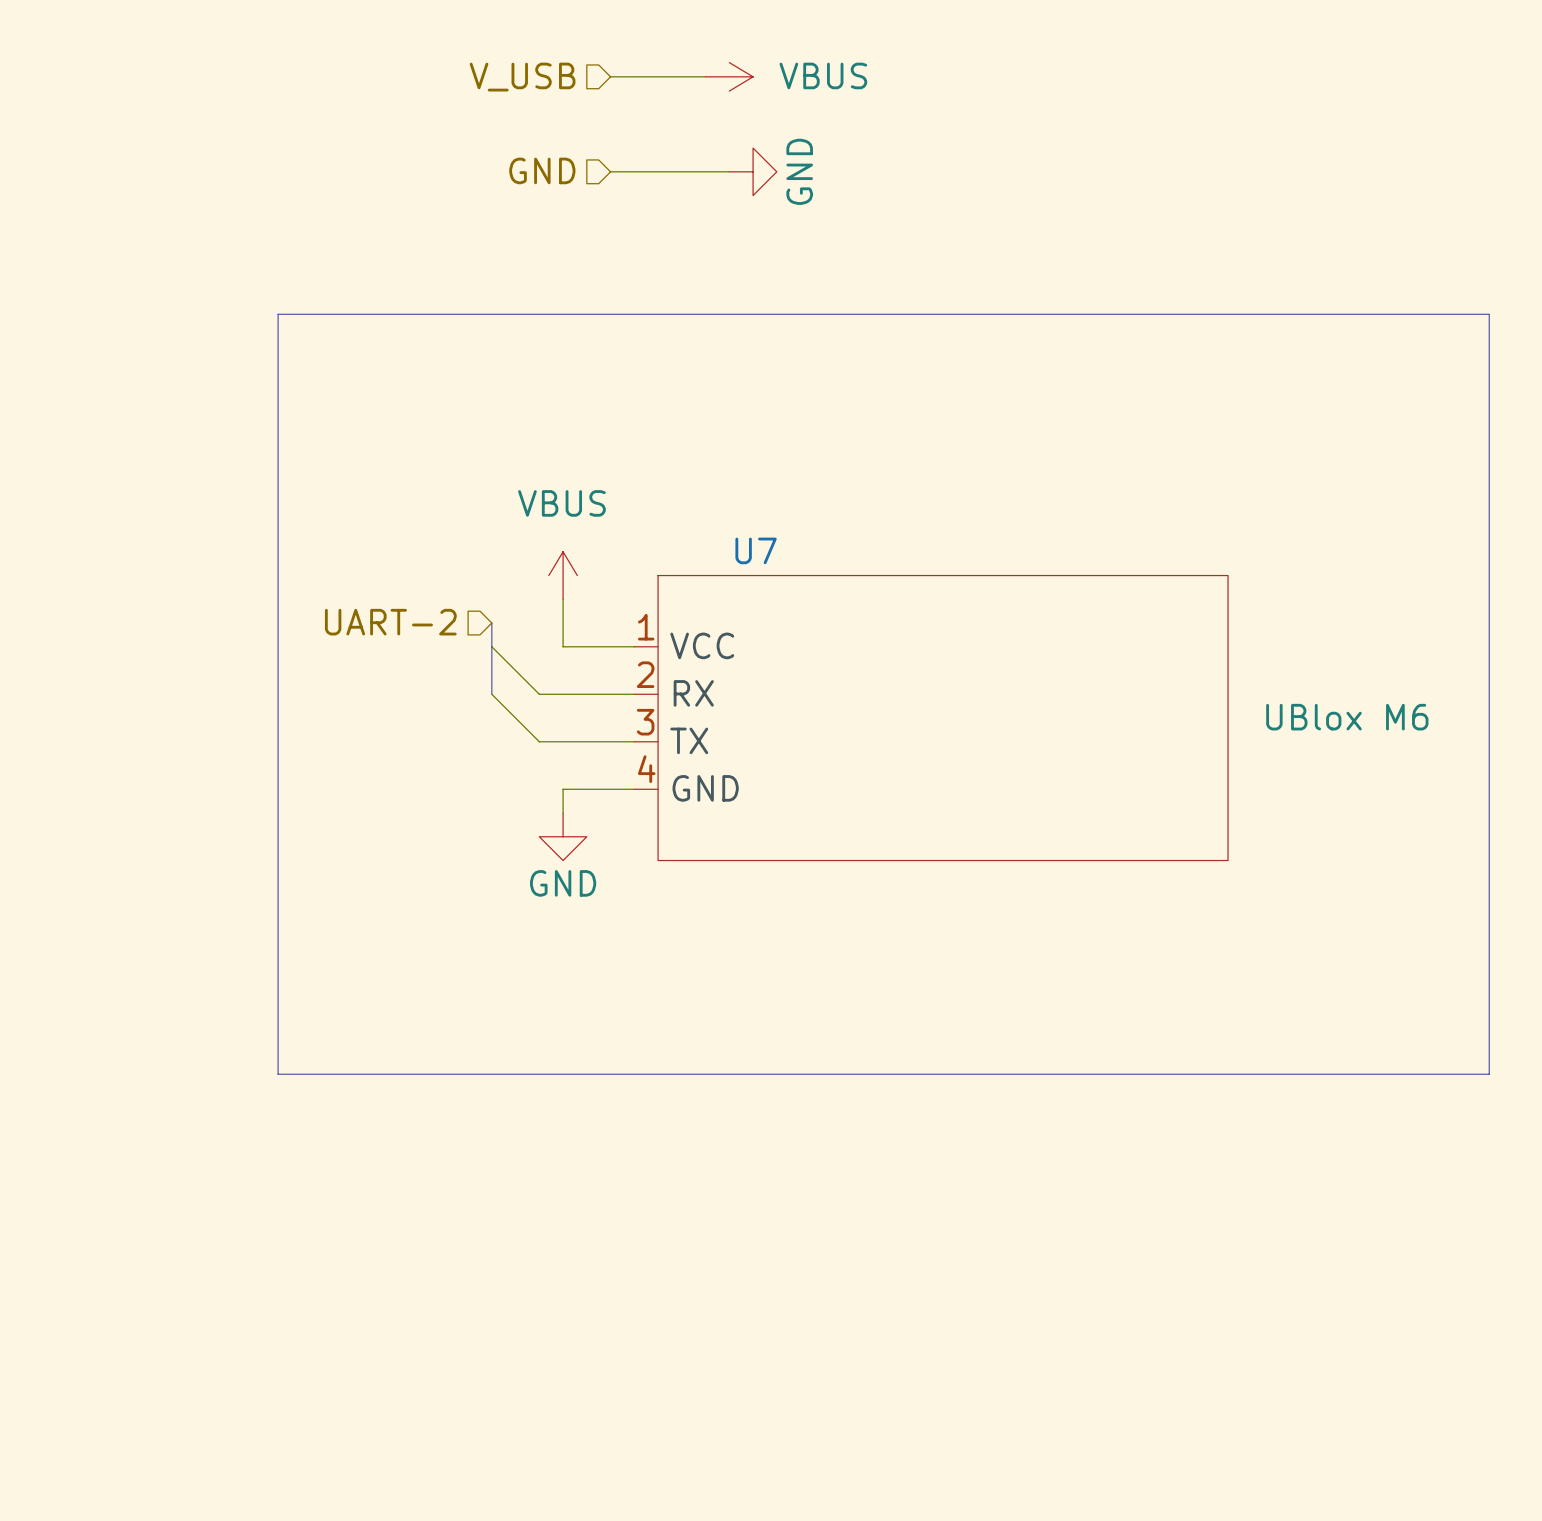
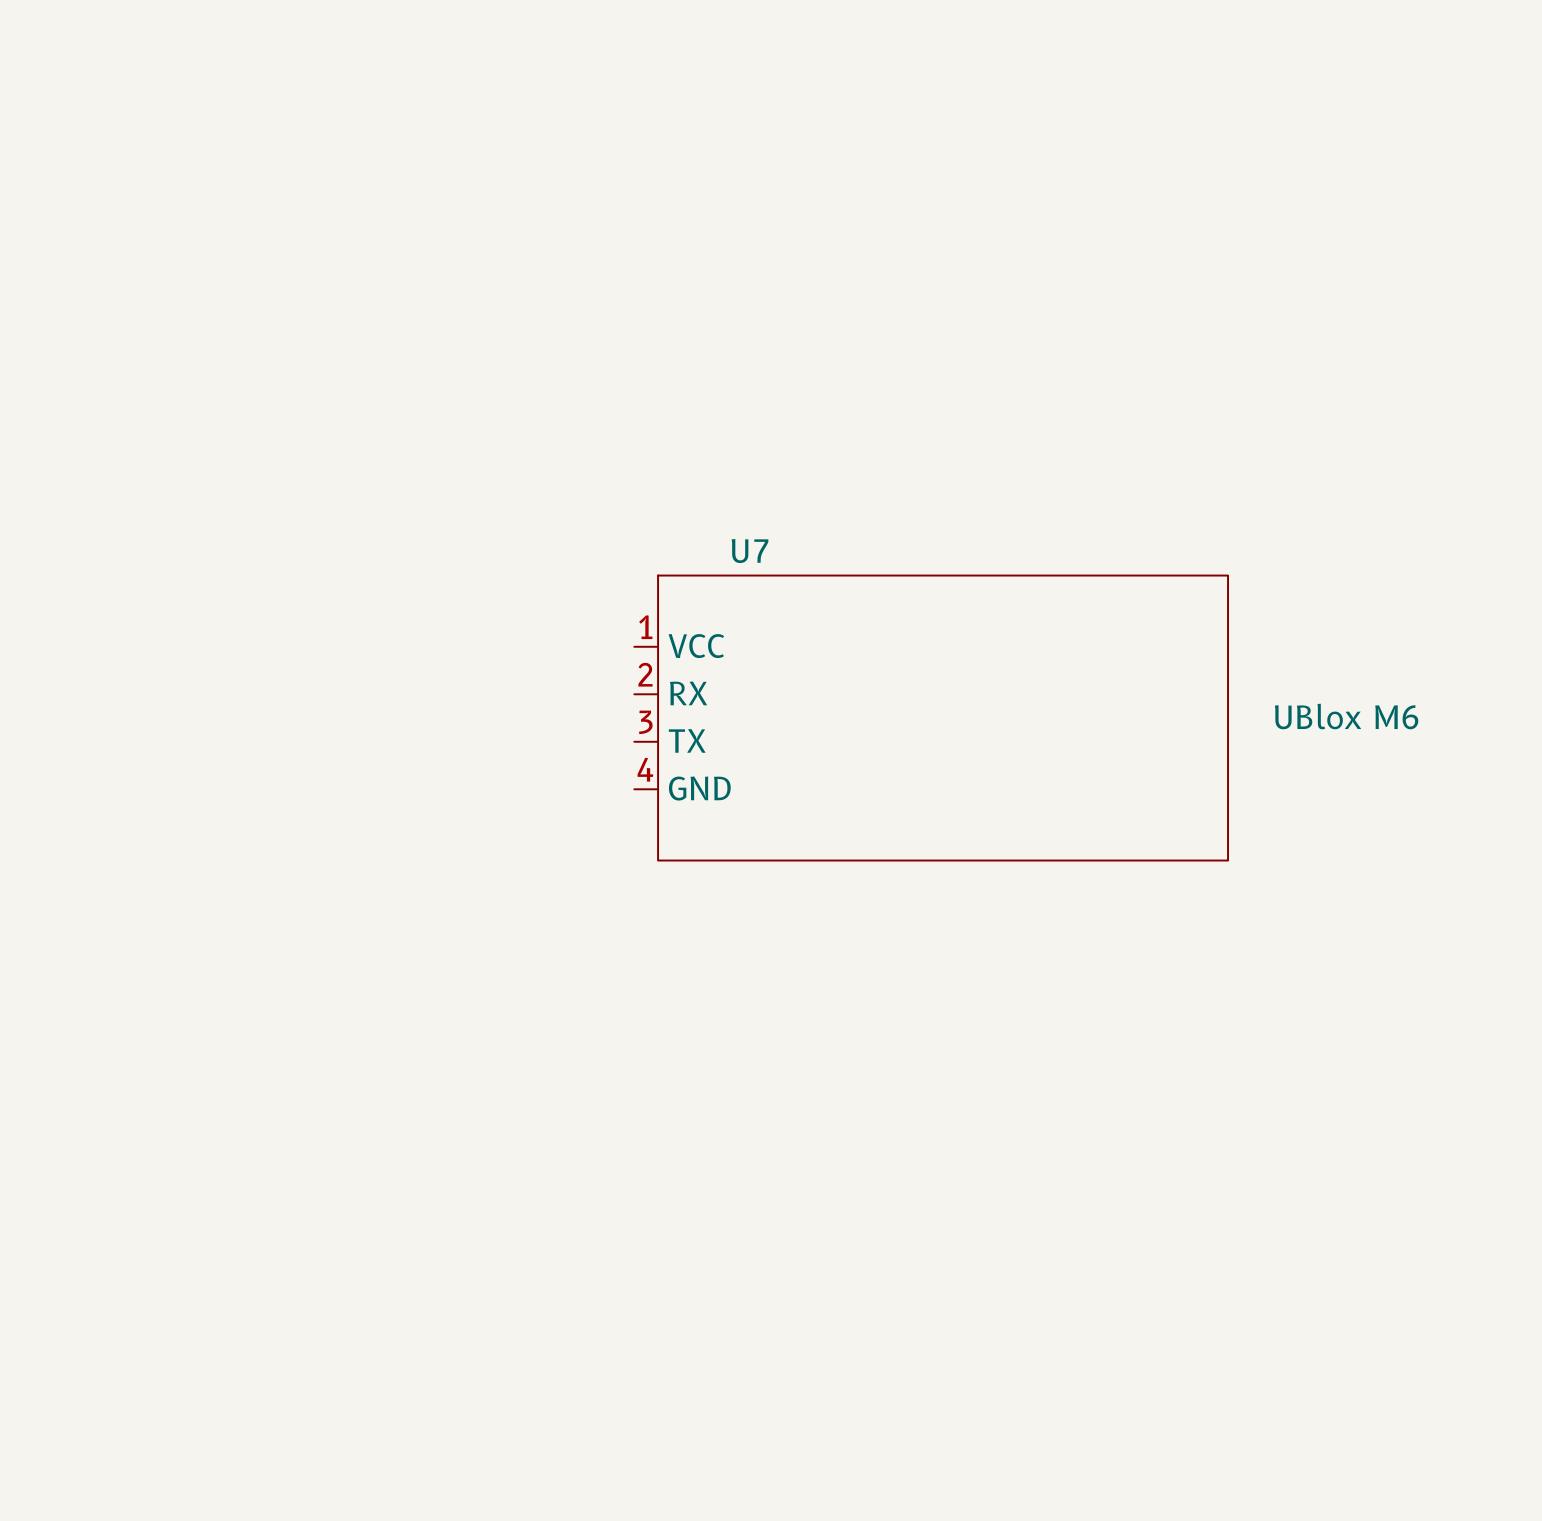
wire: (610, 76) (705, 76) -> none
power symbol: VBUS (729, 76) -> none
hierarchical label: V_USB (522, 77) -> none
hierarchical label: GND (542, 170) -> none
wire: (610, 171) (729, 171) -> none
power symbol: GND (753, 171) -> none
line: (278, 314) (1489, 314) (1489, 1074) (278, 1074) (278, 314) -> none
power symbol: VBUS (563, 575) -> none
wire: (563, 599) (563, 646) (634, 646) -> none
hierarchical label: UART-2 (390, 622) -> none
bus: (491, 623) (491, 694) -> none
wire: (491, 646) (539, 694) (634, 694) -> none
wire: (491, 694) (539, 741) (634, 741) -> none
wire: (634, 789) (563, 789) (563, 813) -> none
power symbol: GND (563, 836) -> none

